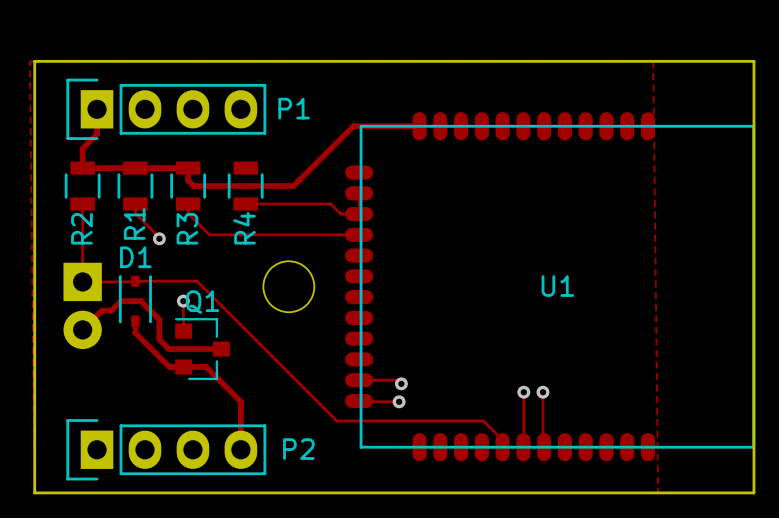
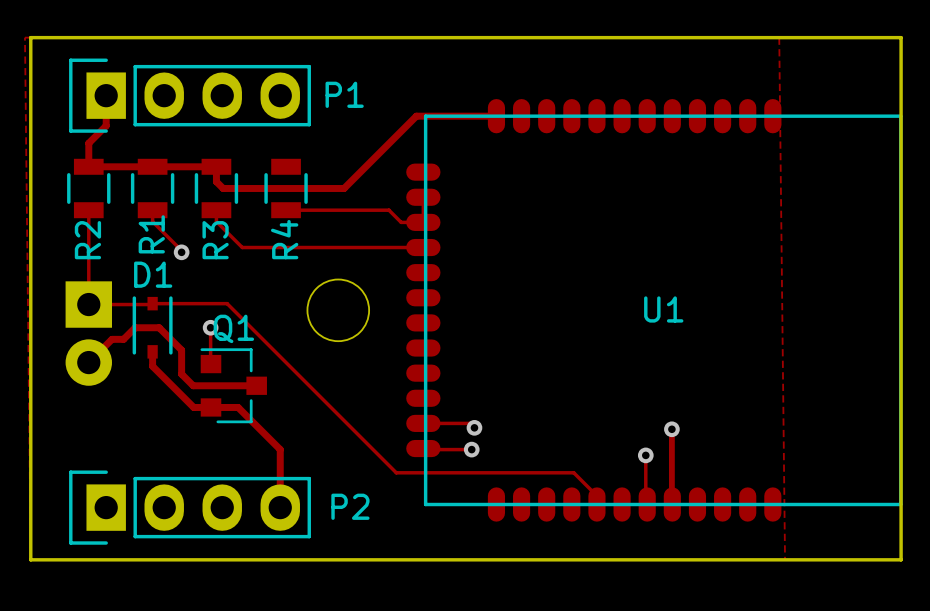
track: none -> (671, 429) (672, 504)
via: none -> (671, 429)
track: (523, 392) (523, 447) -> none
via: (523, 392) -> none
track: (543, 392) (543, 406) -> none
via: (543, 392) -> none
via: none -> (645, 455)

